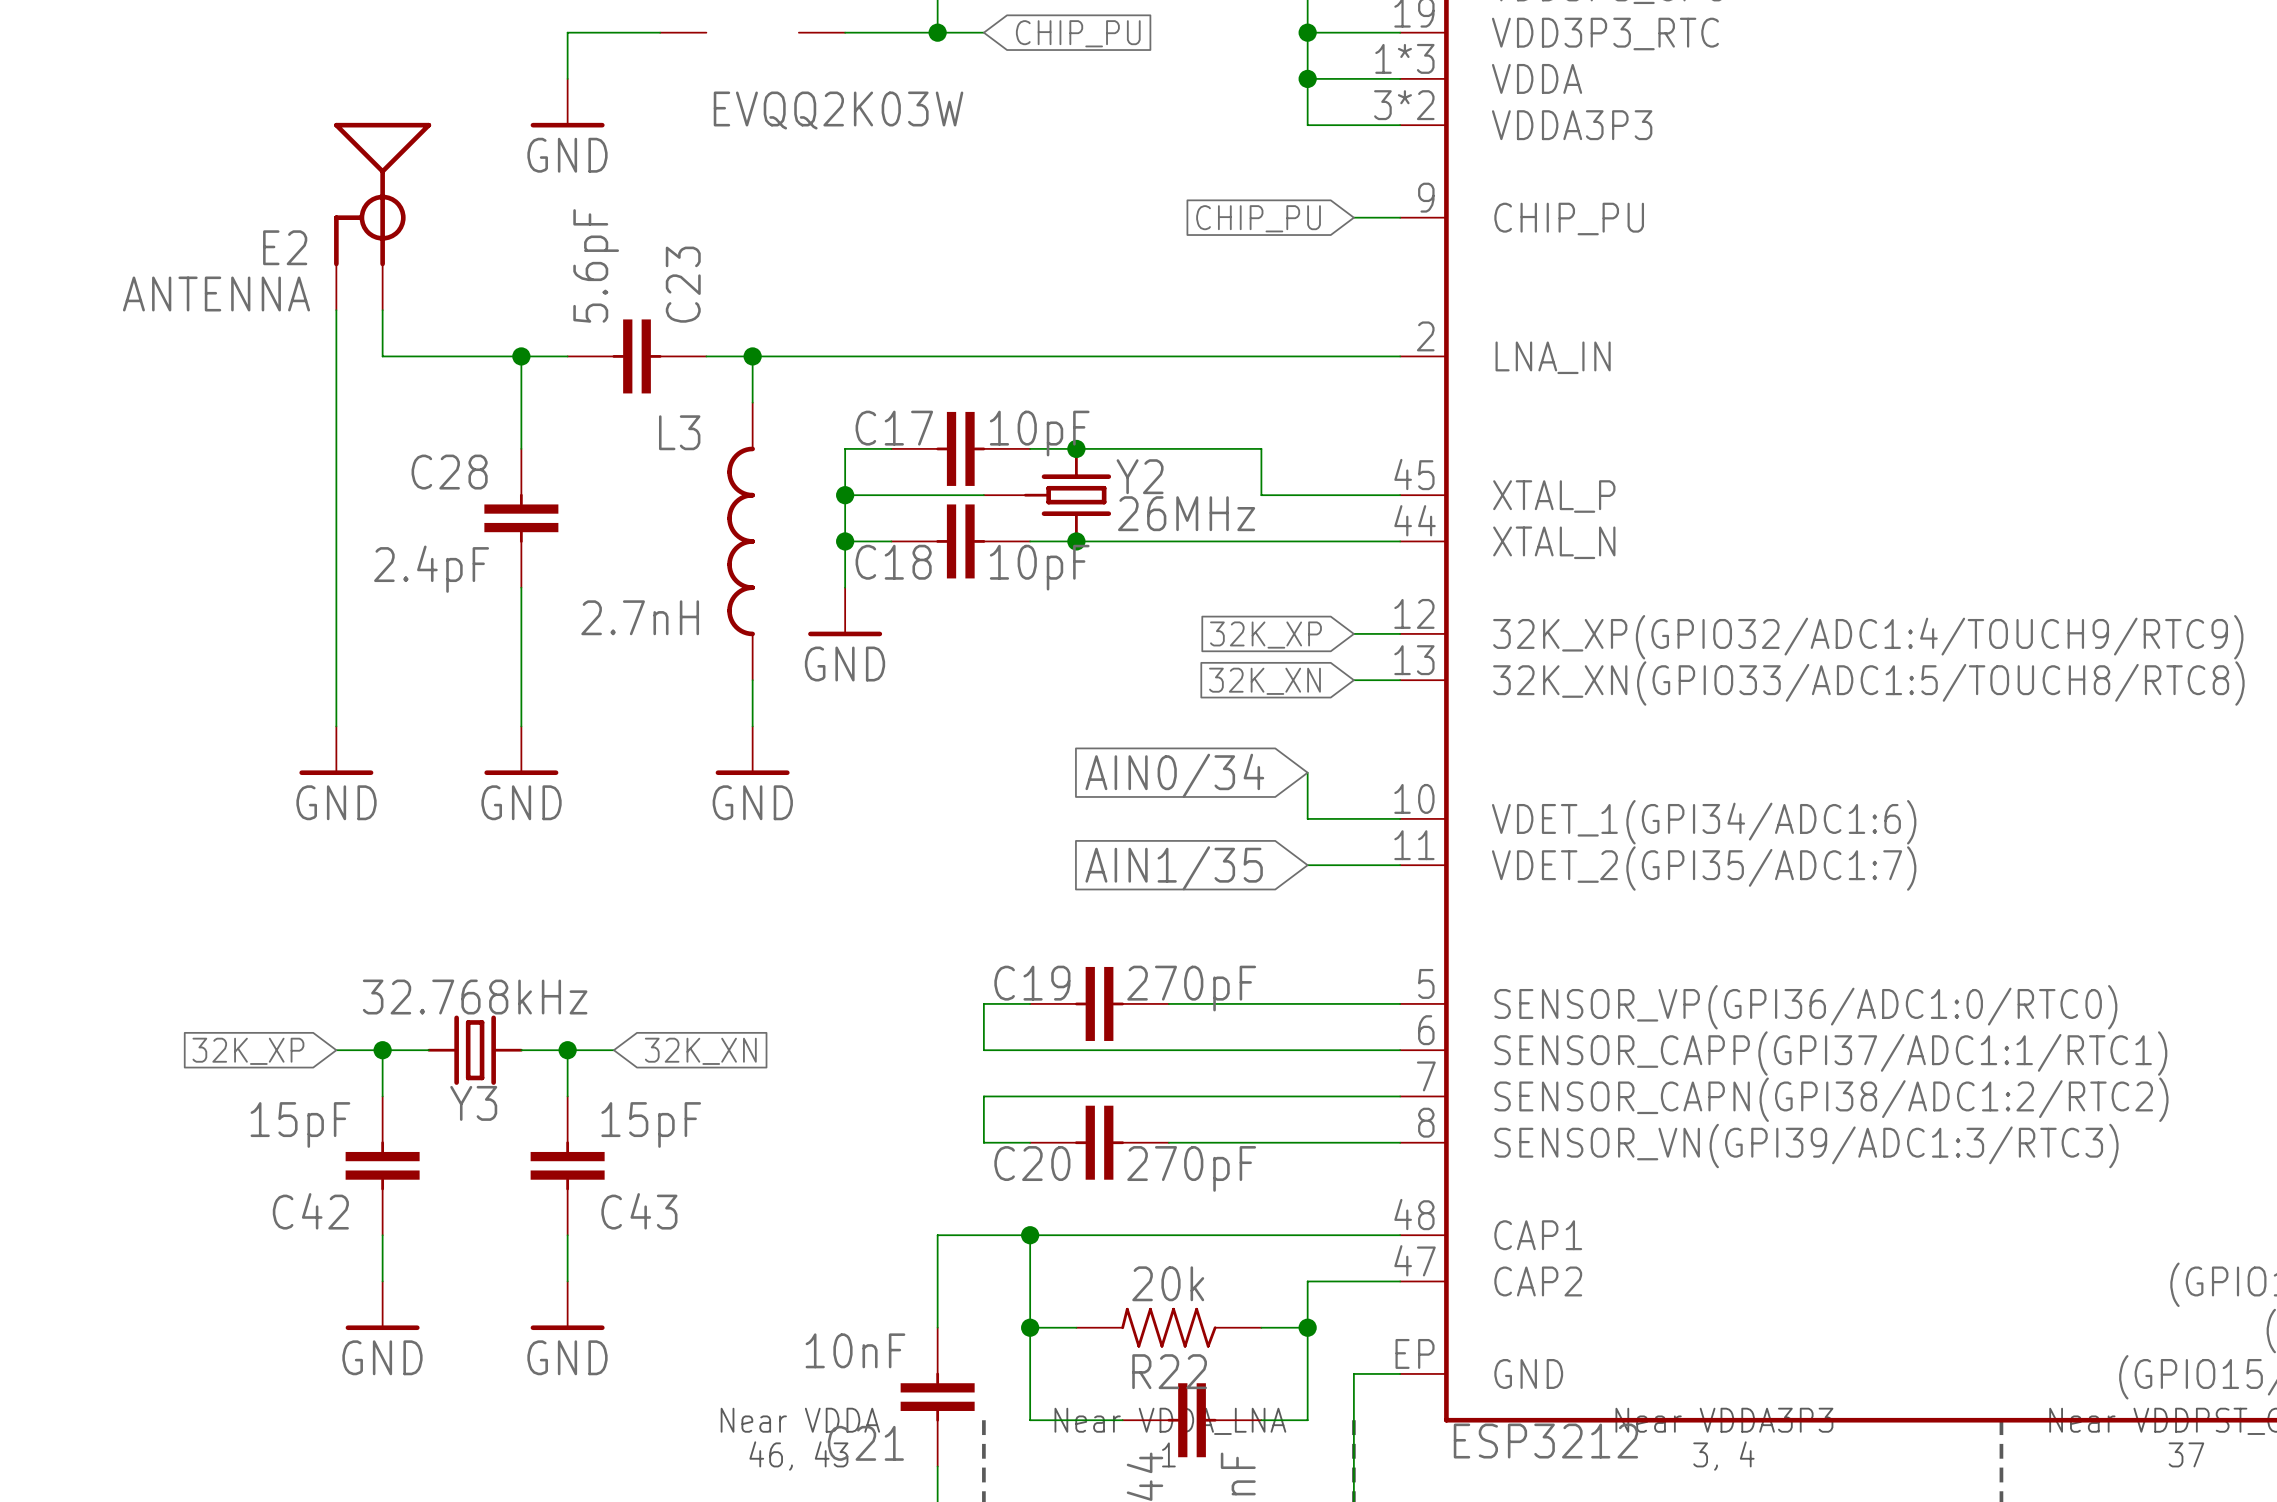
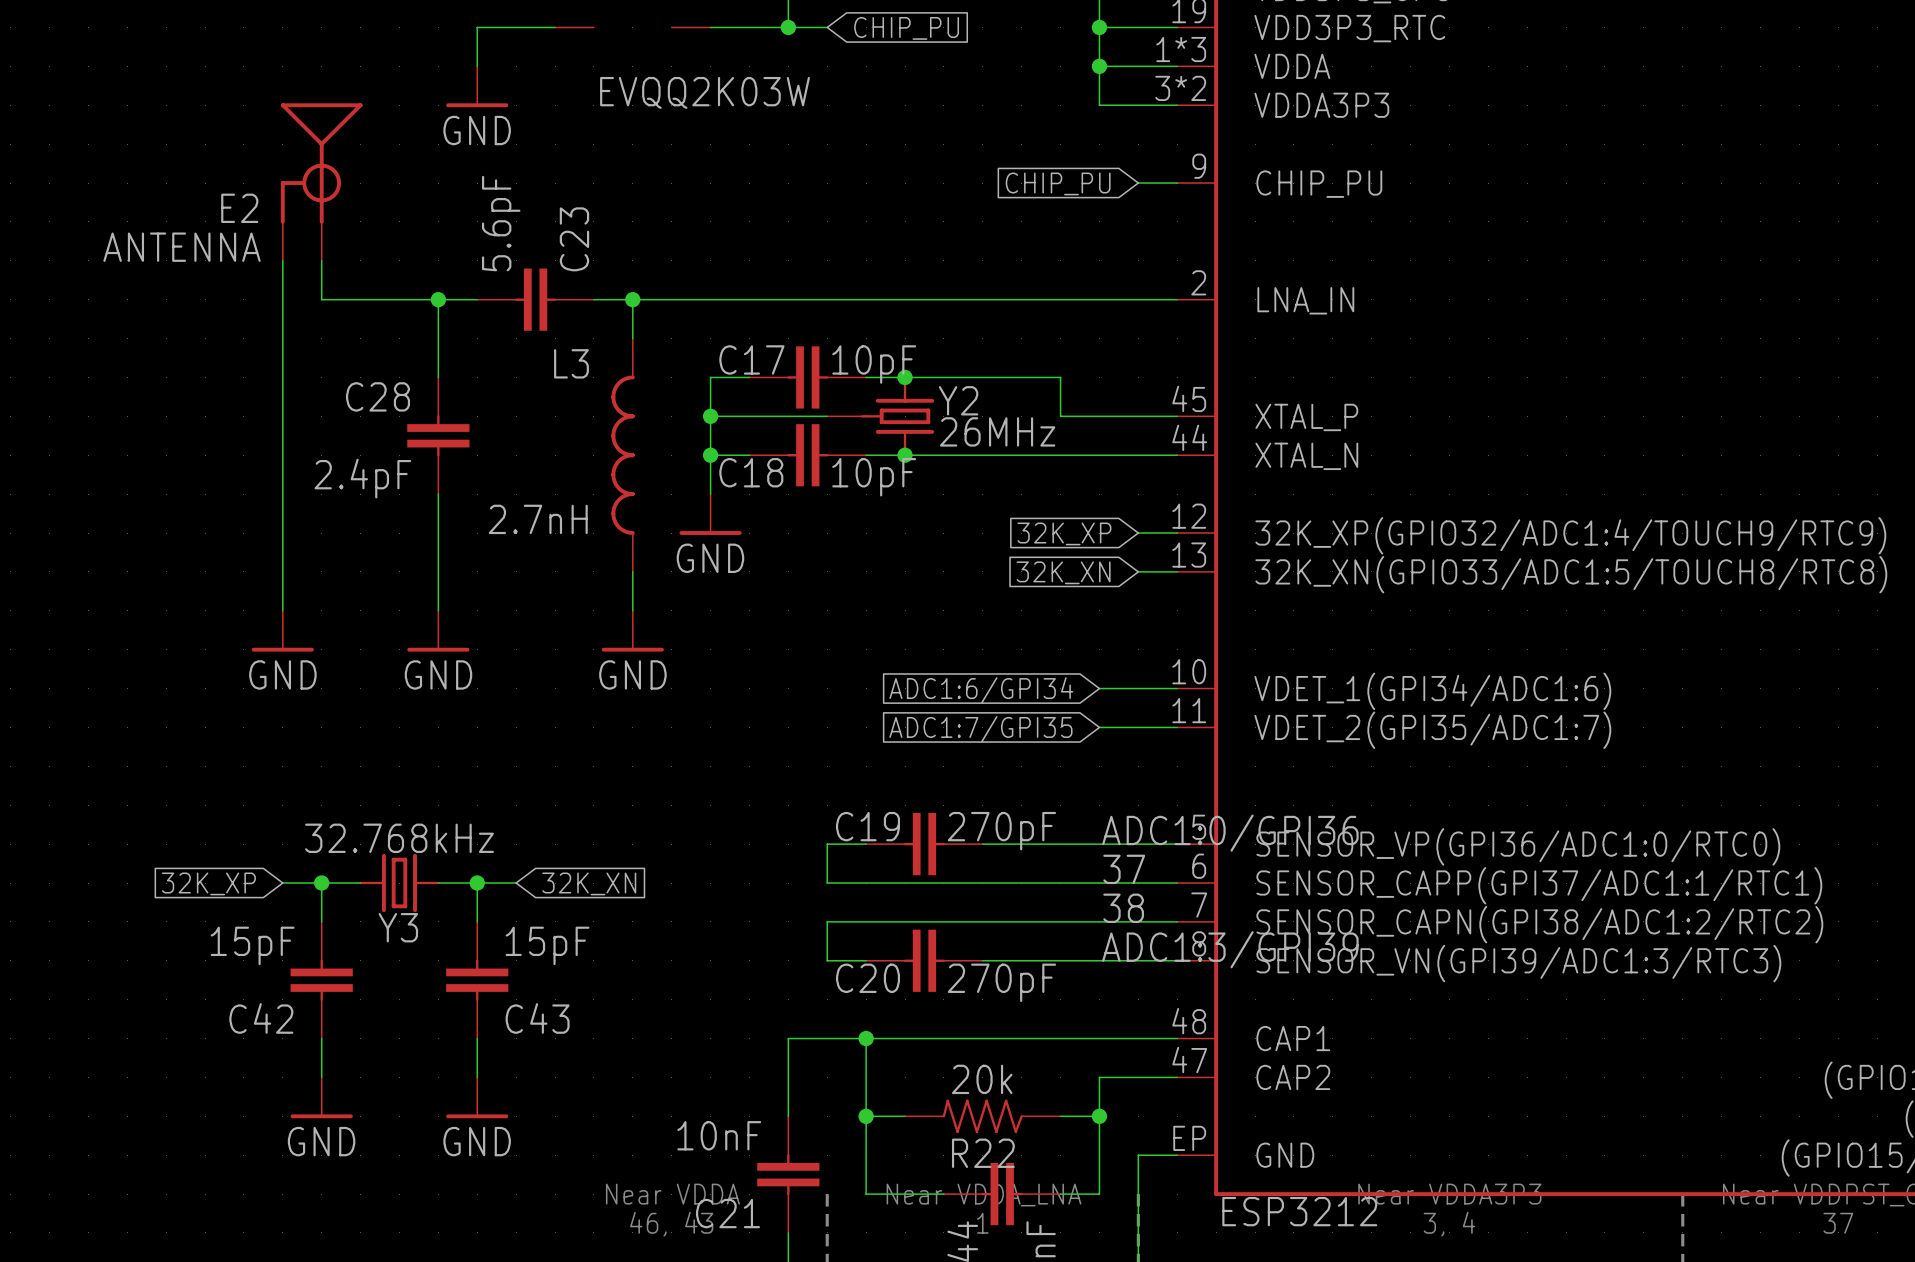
wire: (1307, 772) (1307, 818) -> none
global label: AIN0/34 (1174, 775) -> none
global label: none -> ADC1:6/GPI34 (981, 690)
global label: AIN1/35 (1174, 868) -> ADC1:7/GPI35 (980, 729)
label: none -> ADC1:0/GPI36 (1230, 833)
label: none -> 37 (1124, 869)
label: none -> 38 (1123, 908)
label: none -> ADC1:3/GPI39 (1230, 949)

